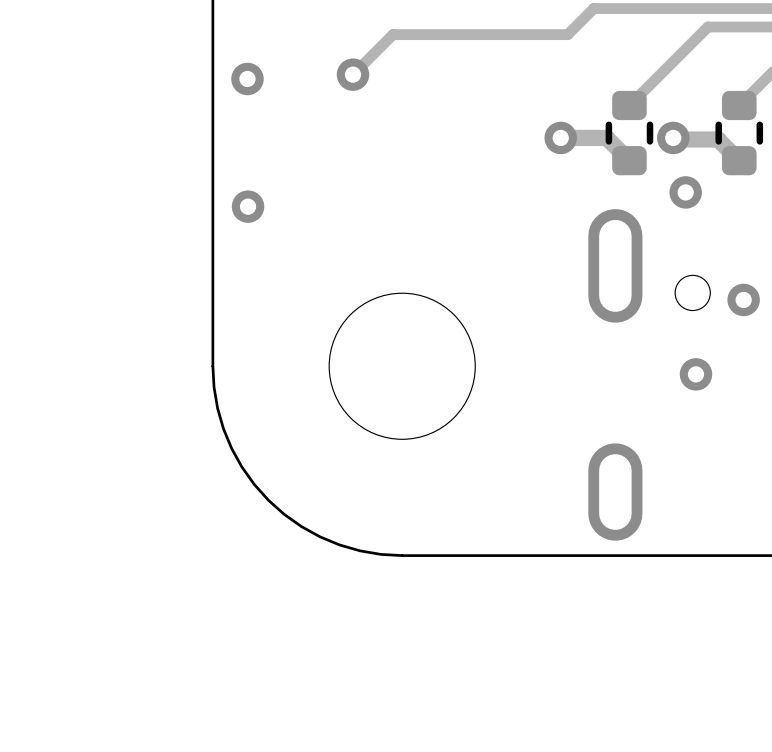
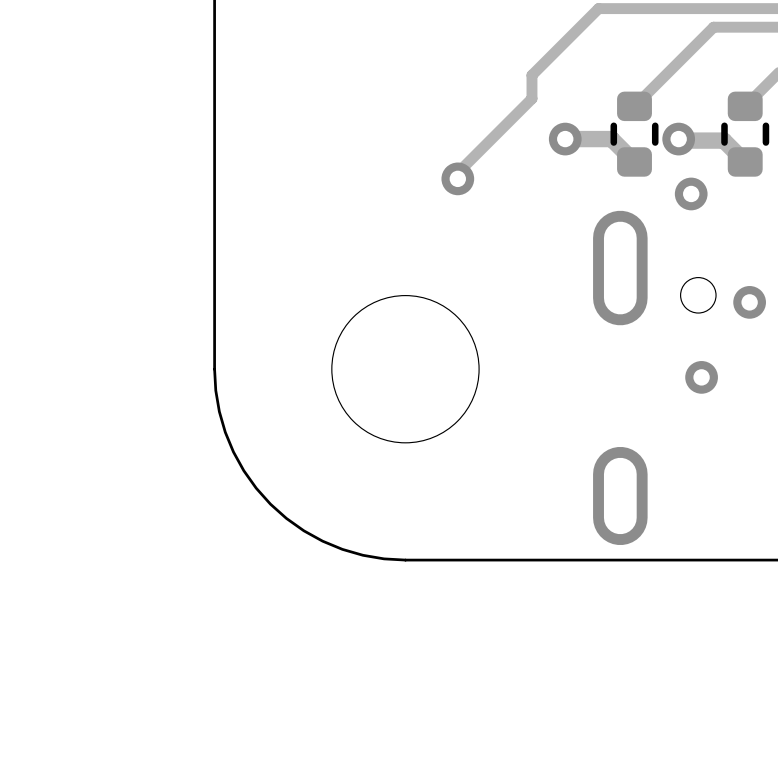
track: (567, 34) (393, 34) (352, 74) -> (572, 34) (531, 75) (531, 98) (457, 172) (457, 178)
via: (352, 74) -> none
via: (247, 78) -> none
via: none -> (457, 178)
via: (248, 206) -> none

